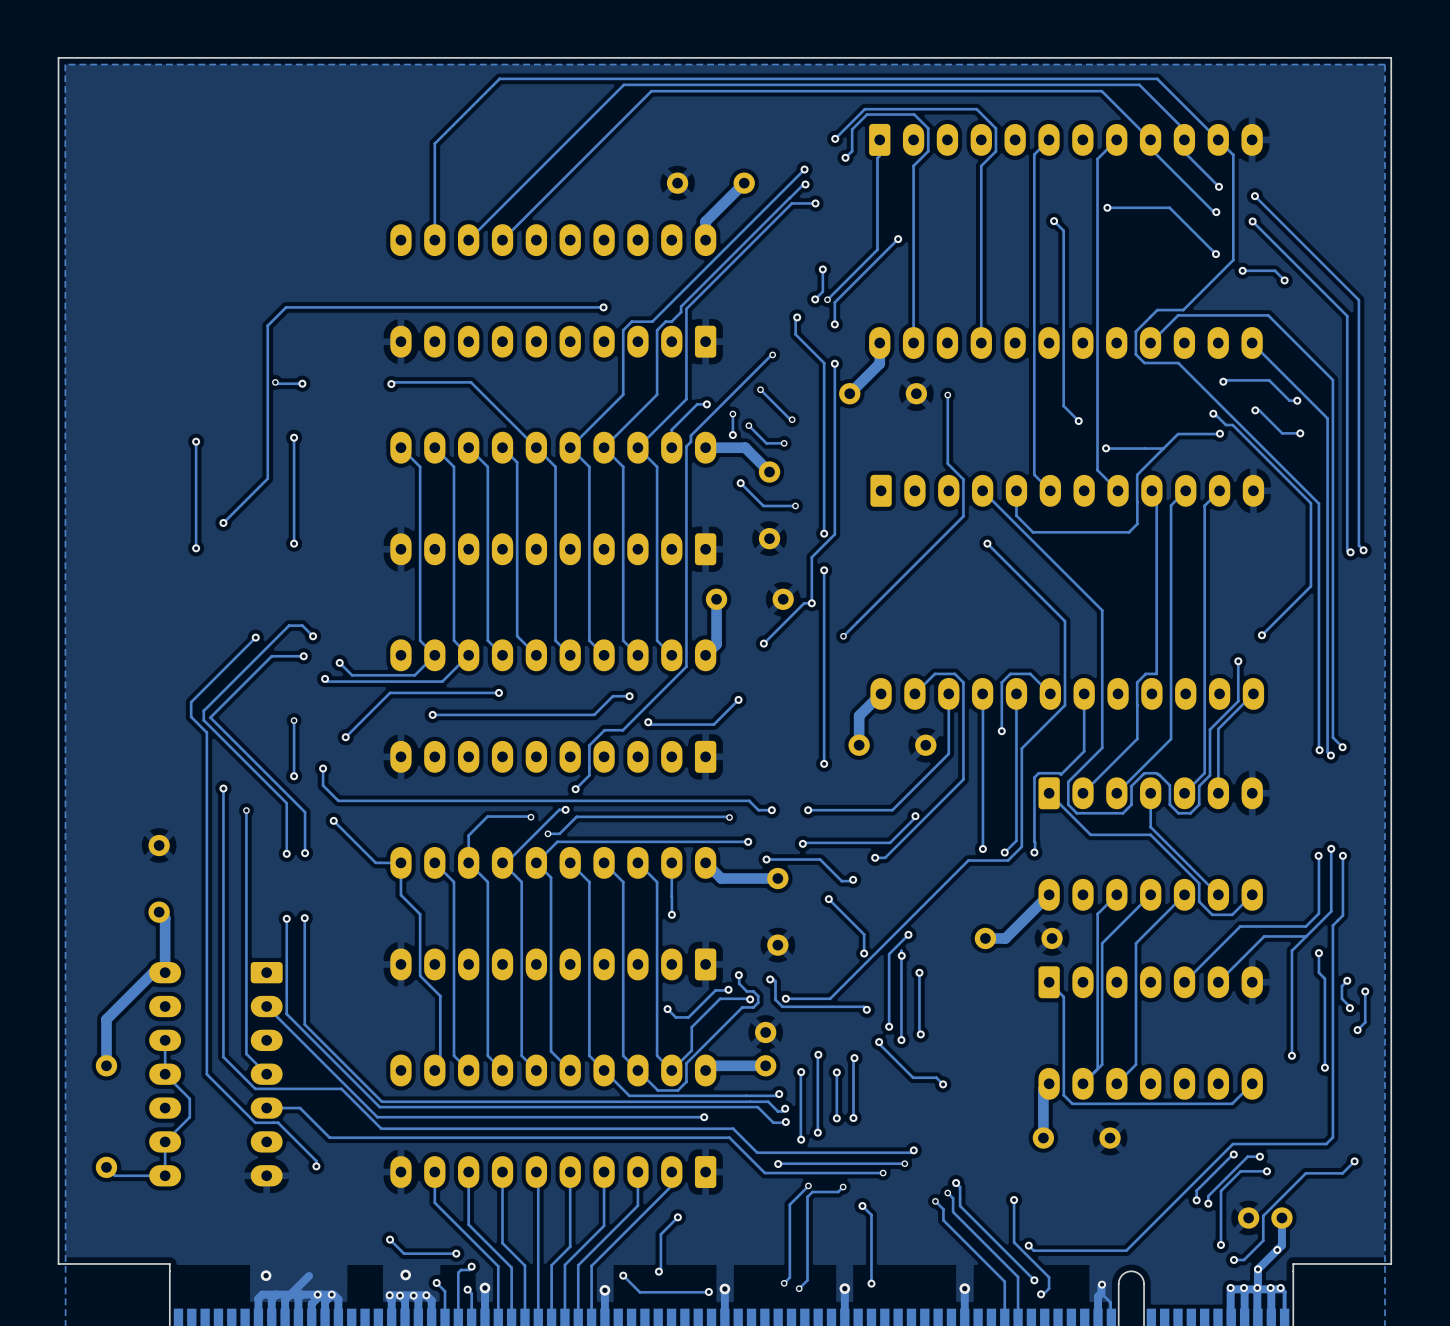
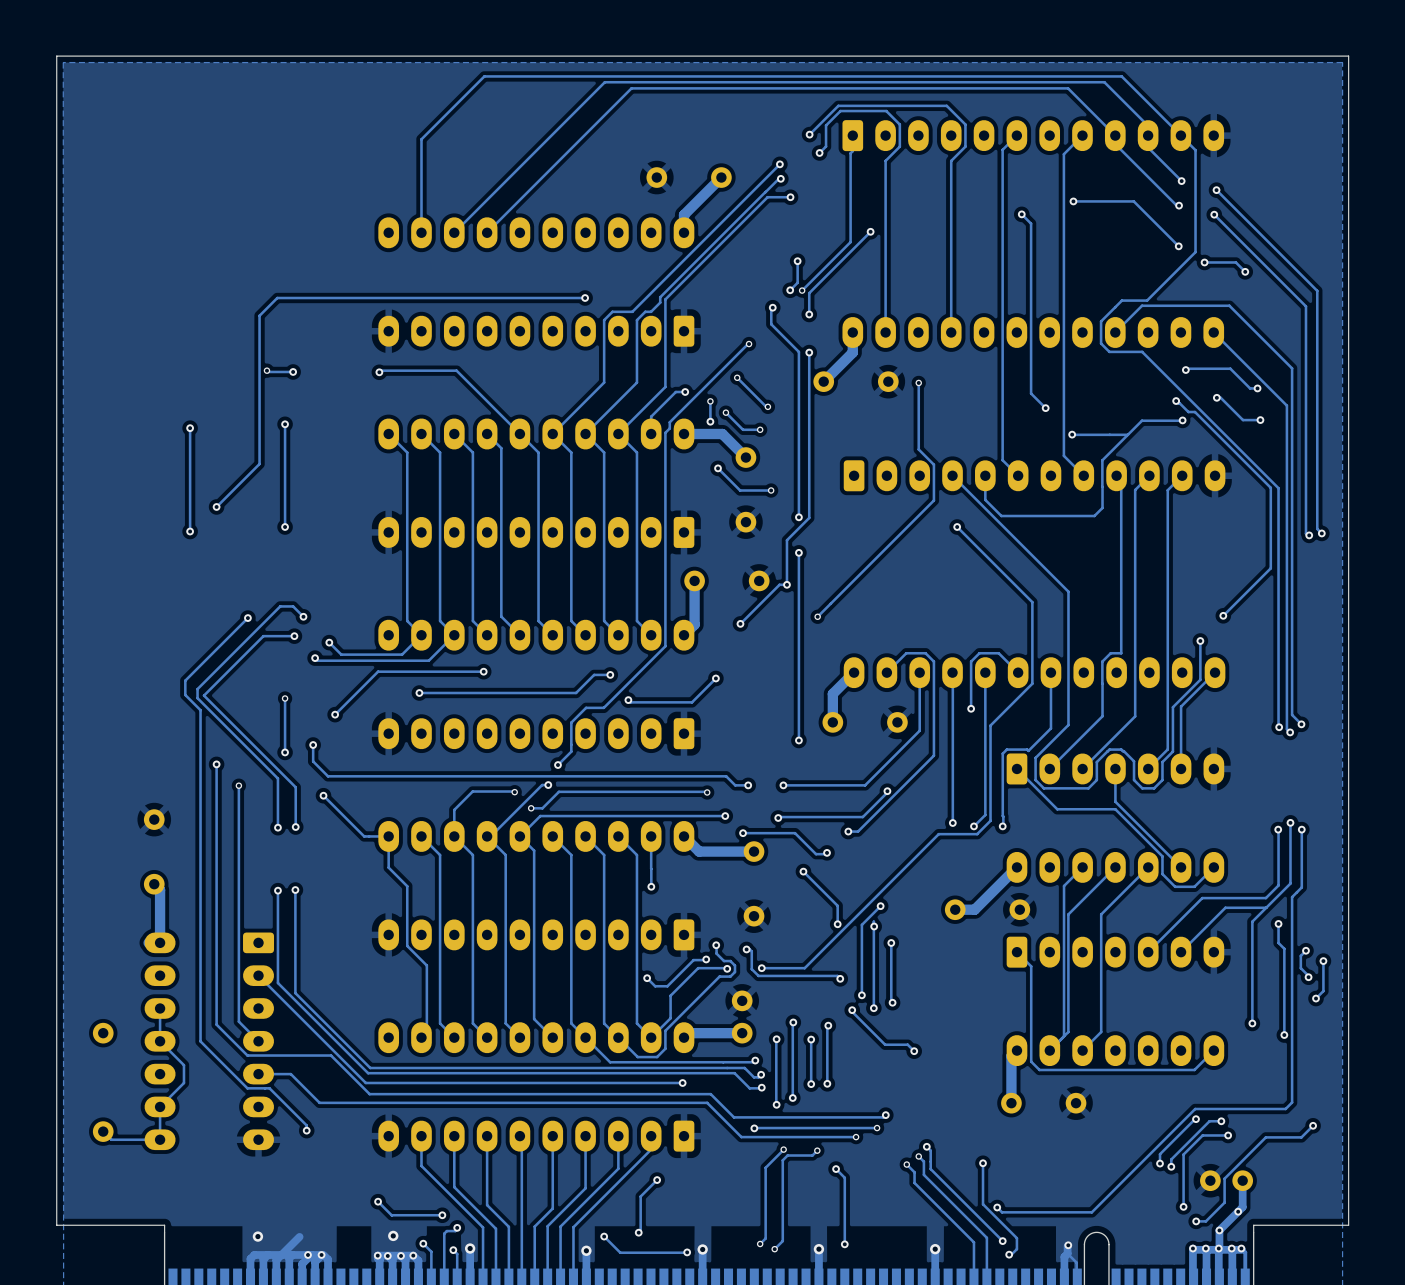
track: (153, 972) (106, 1019) (106, 1065) -> none

